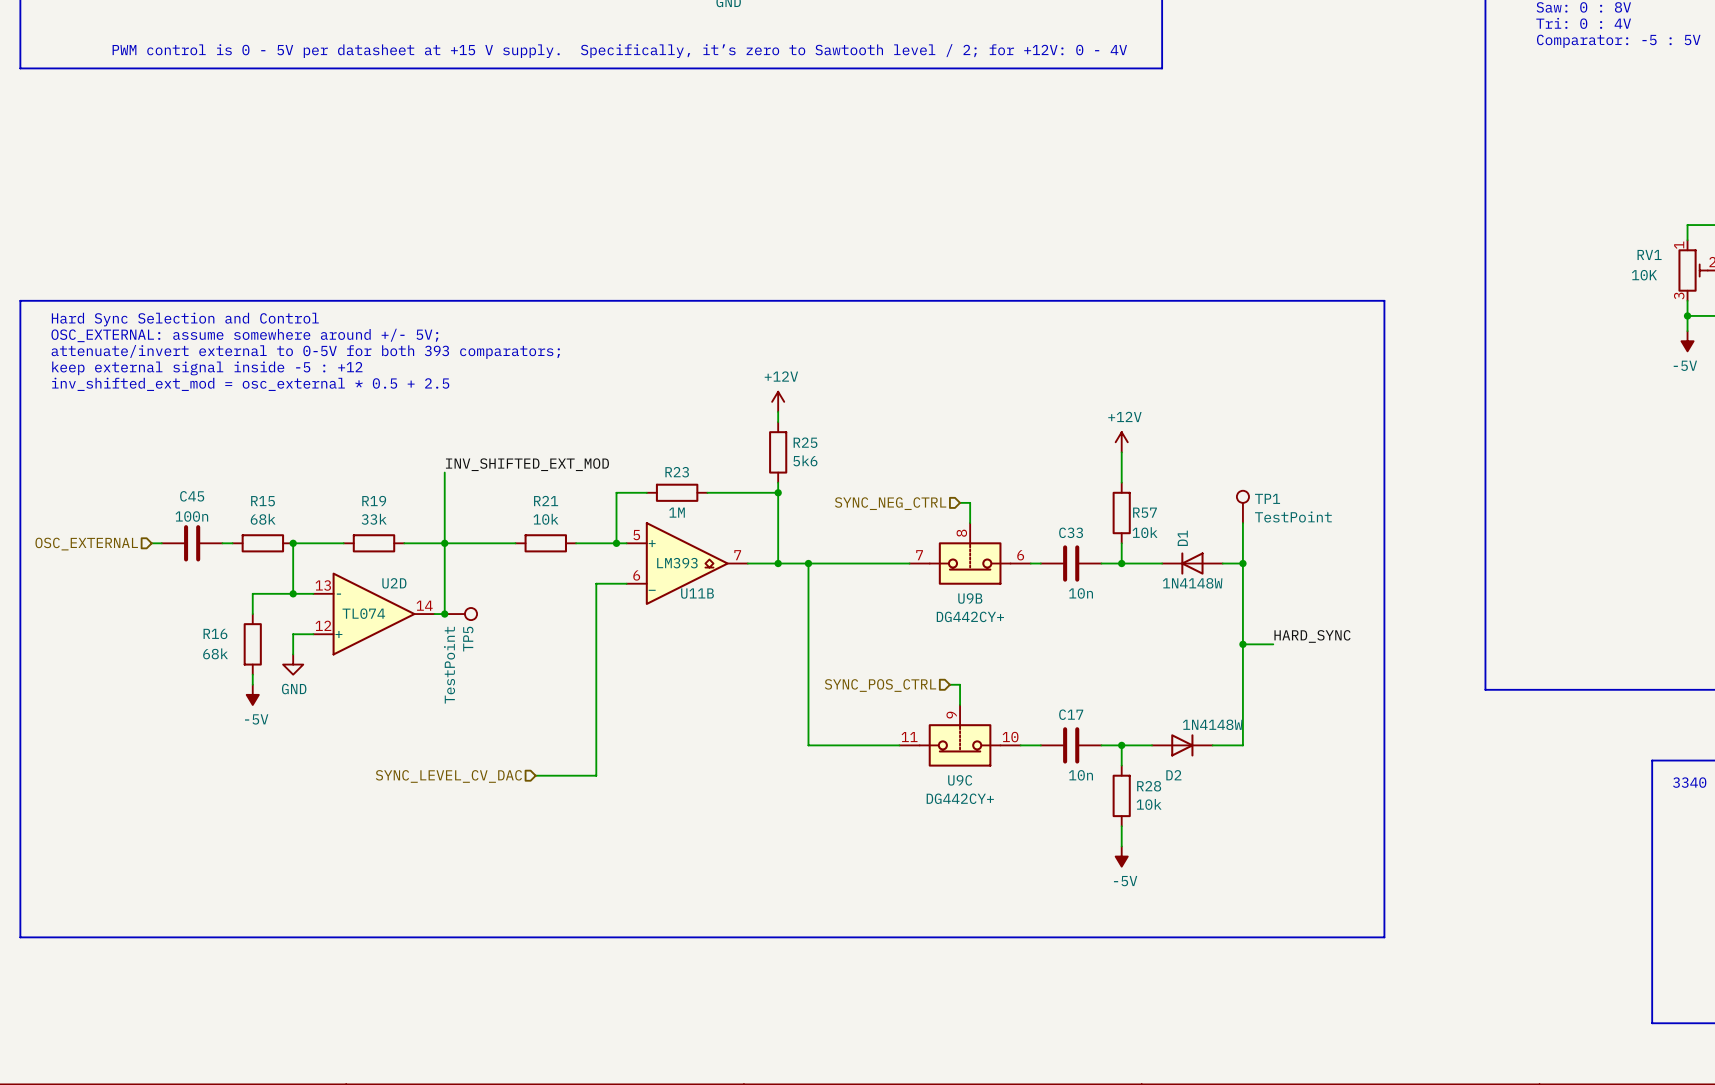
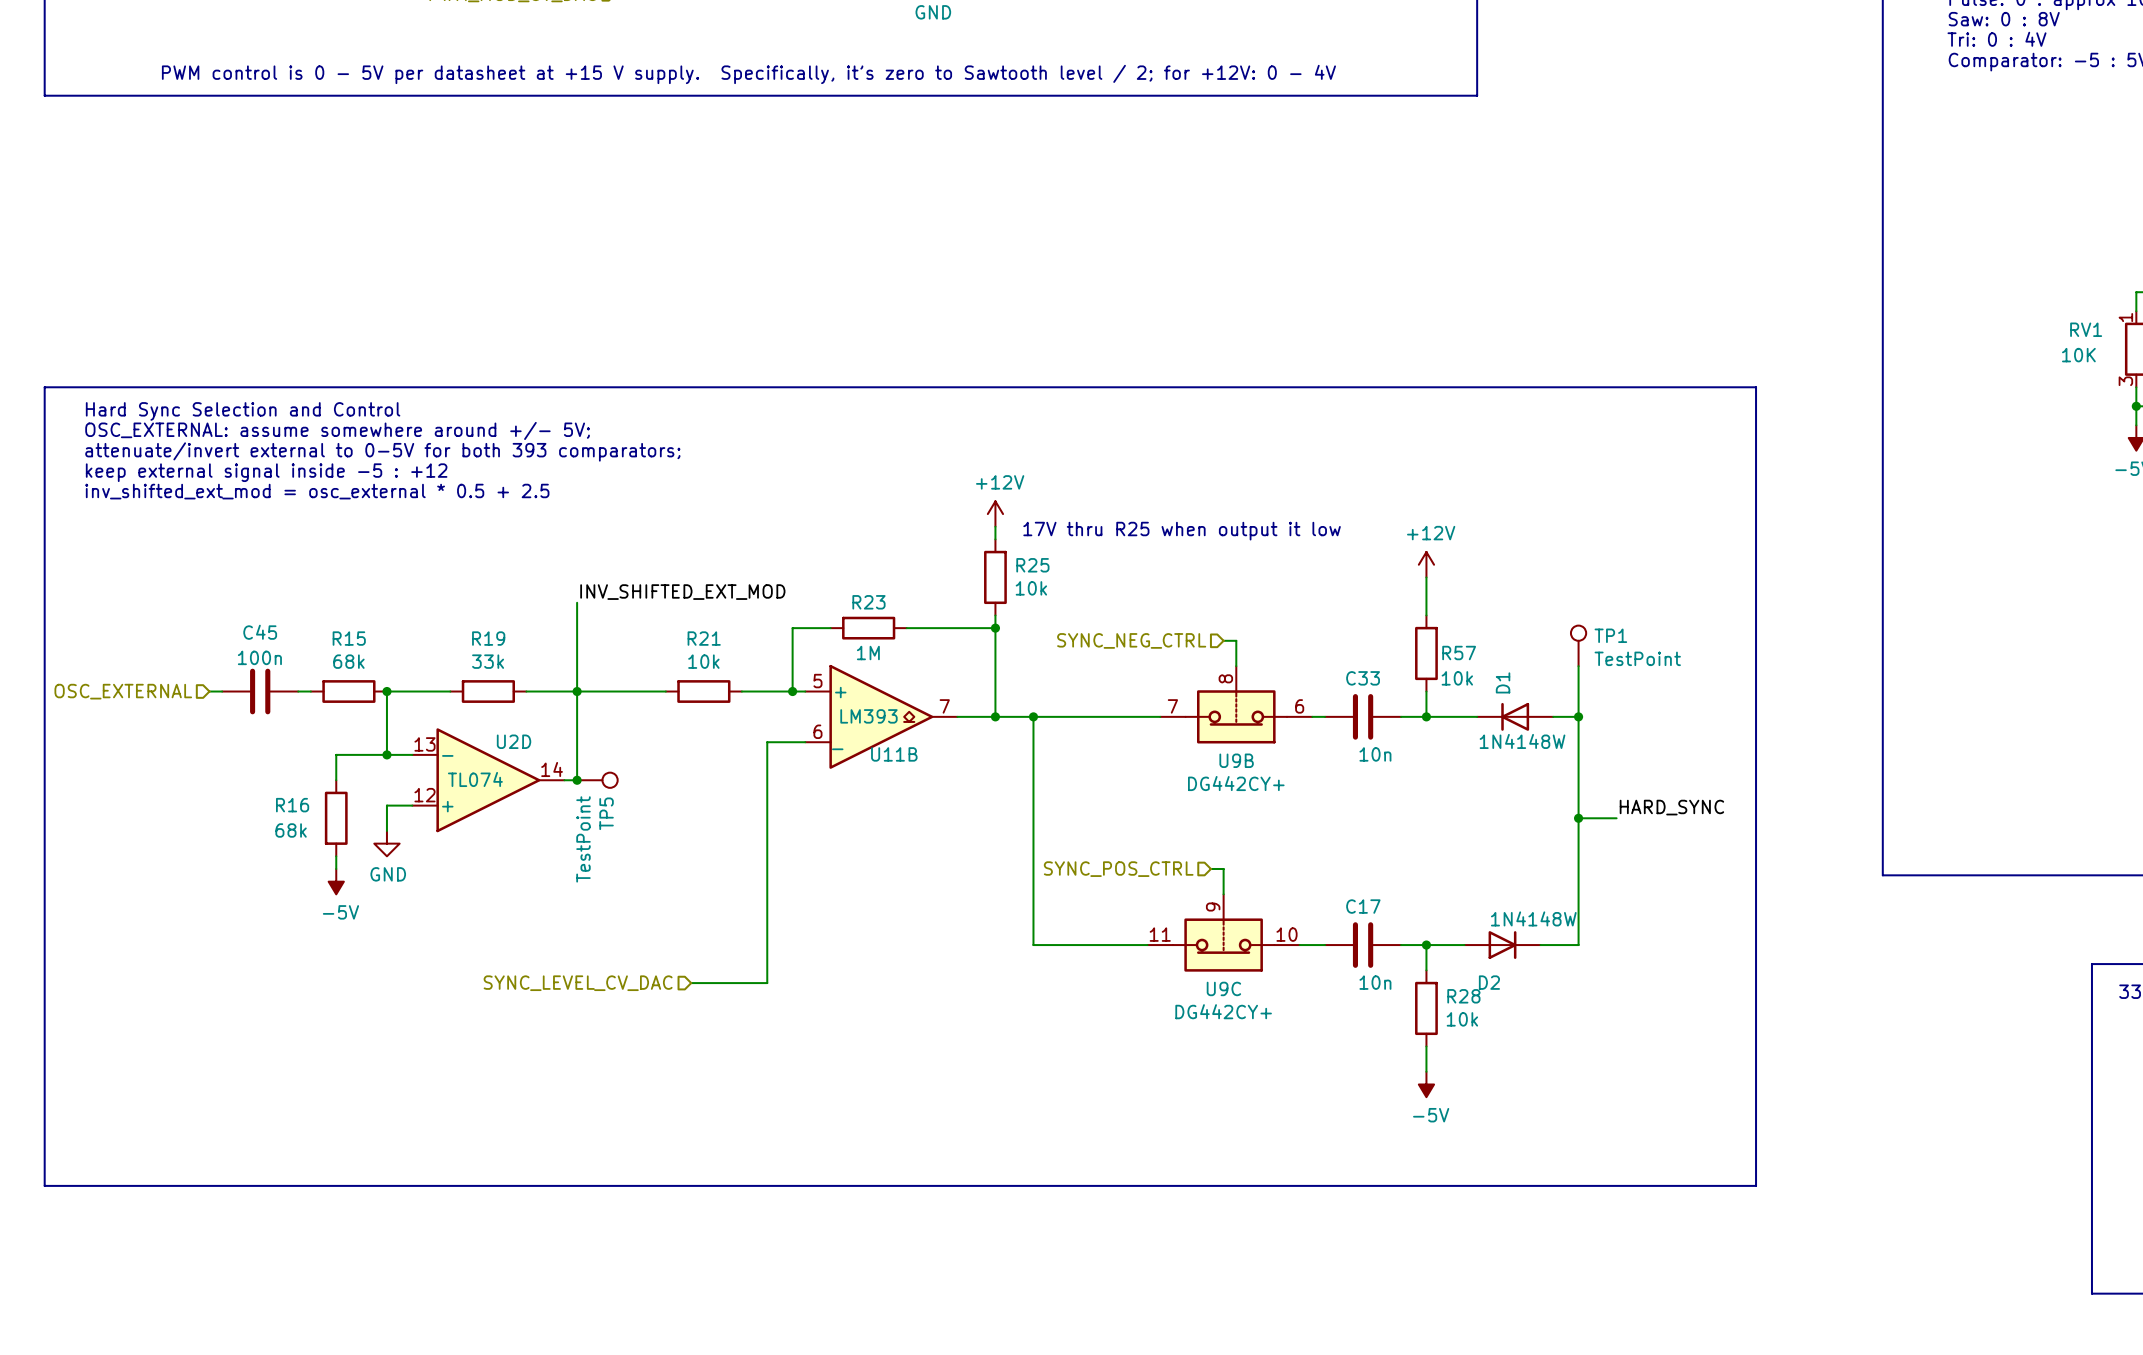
text: none -> 17V thru R25 when output it low (1182, 531)
R25 value: 5k6 (805, 460) -> 10k (1031, 588)

